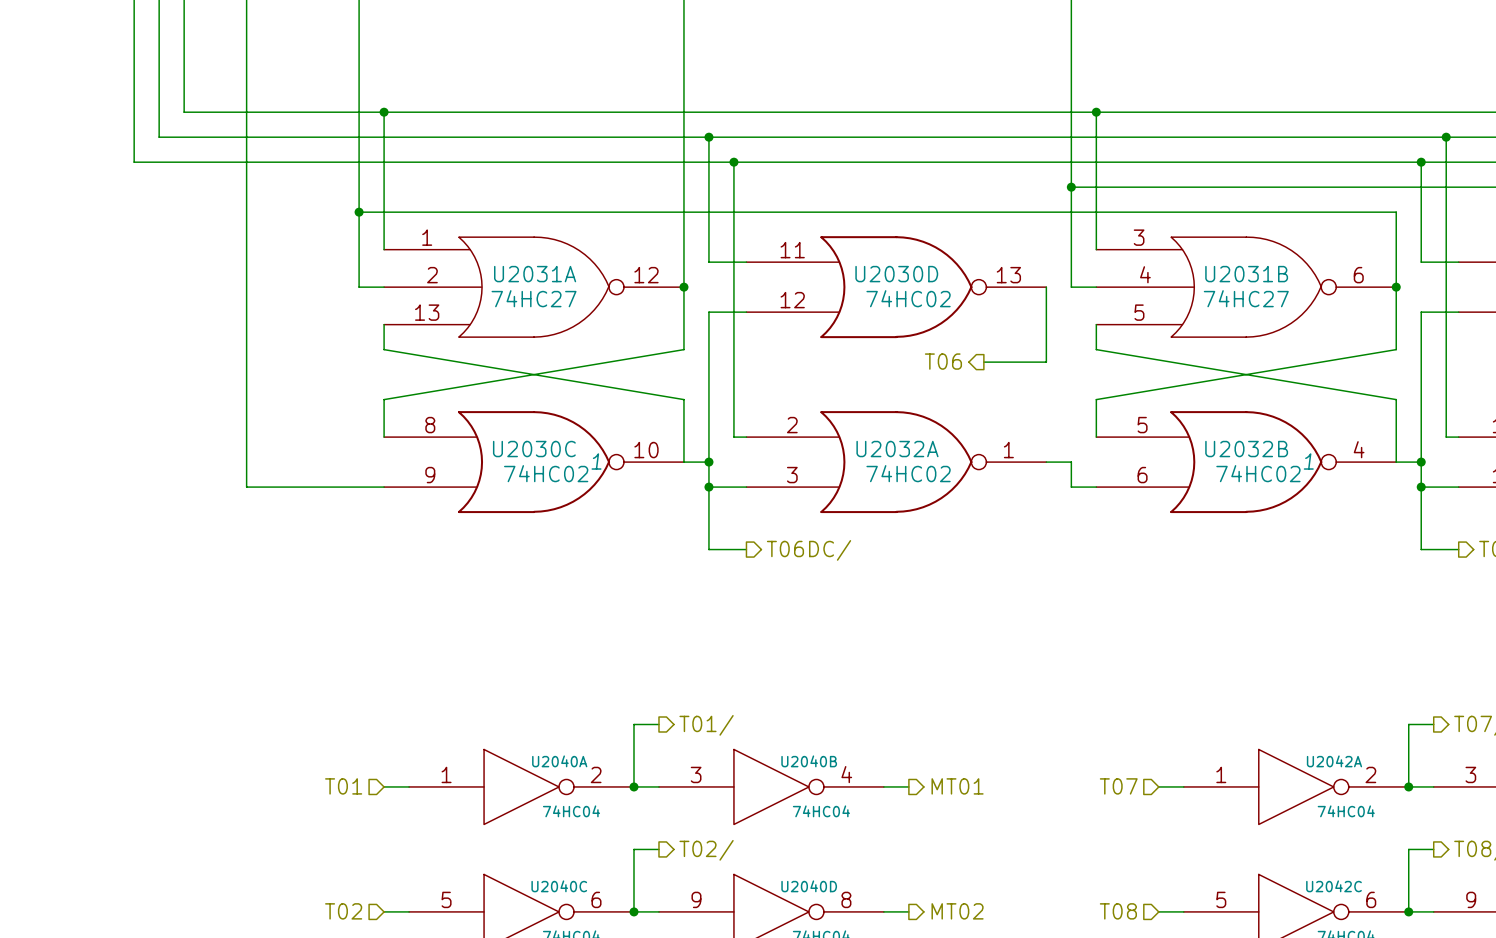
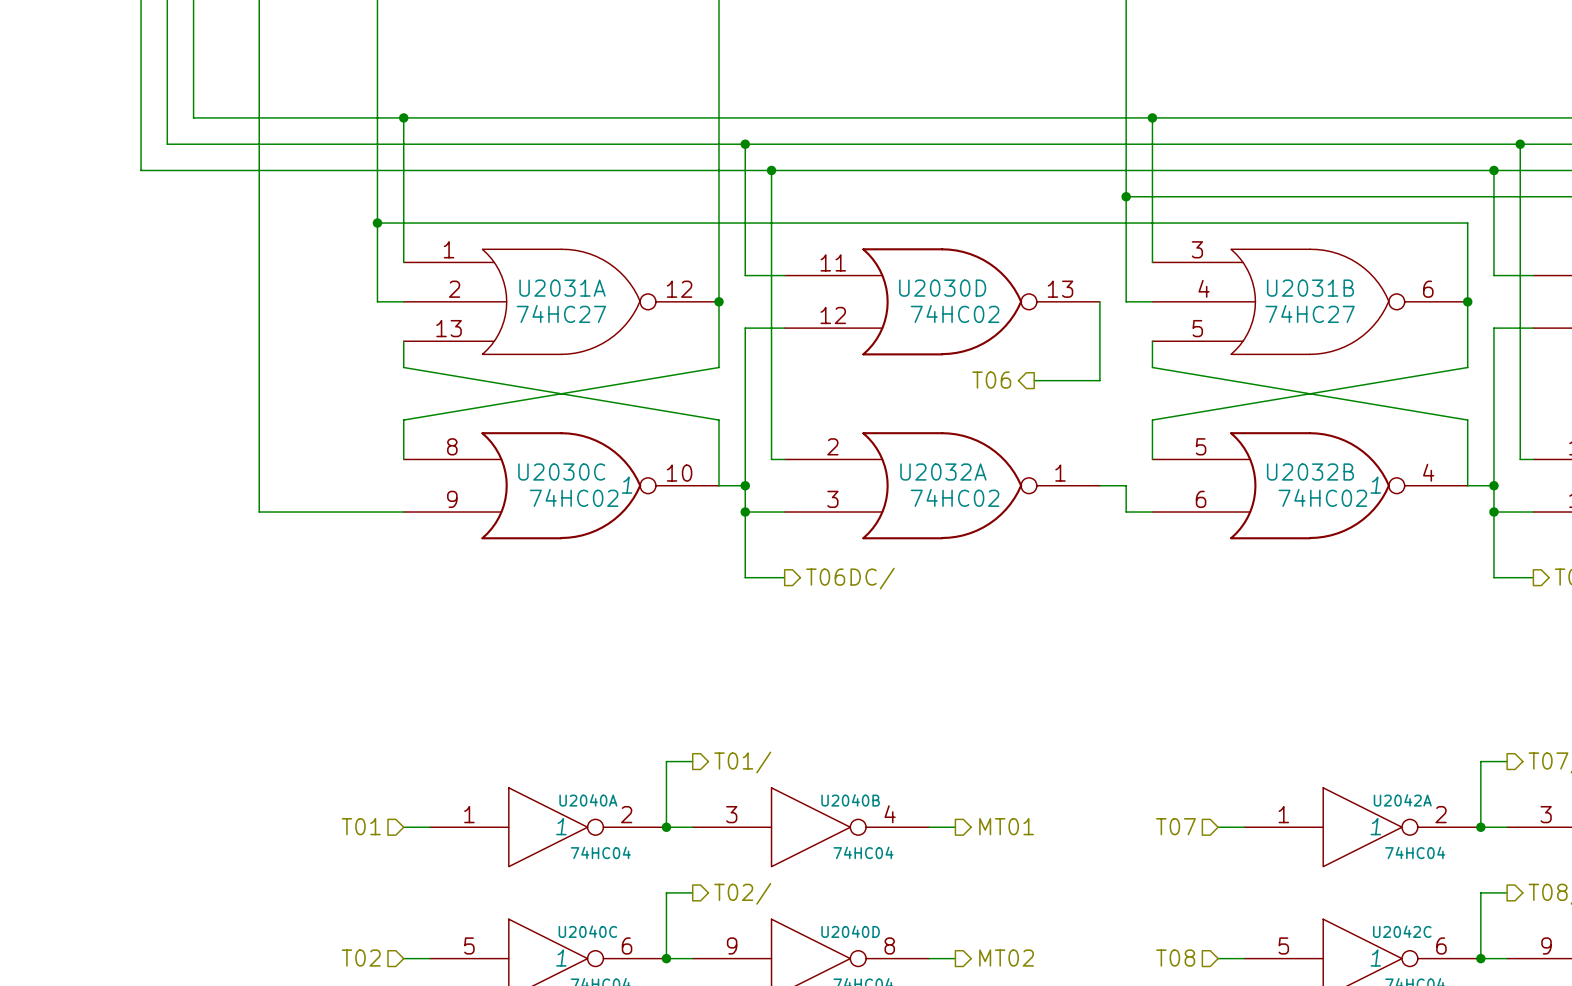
U2040A text: none -> 1 (561, 826)
U2042A text: none -> 1 (1375, 826)
U2040C text: none -> 1 (561, 958)
U2042C text: none -> 1 (1375, 958)

